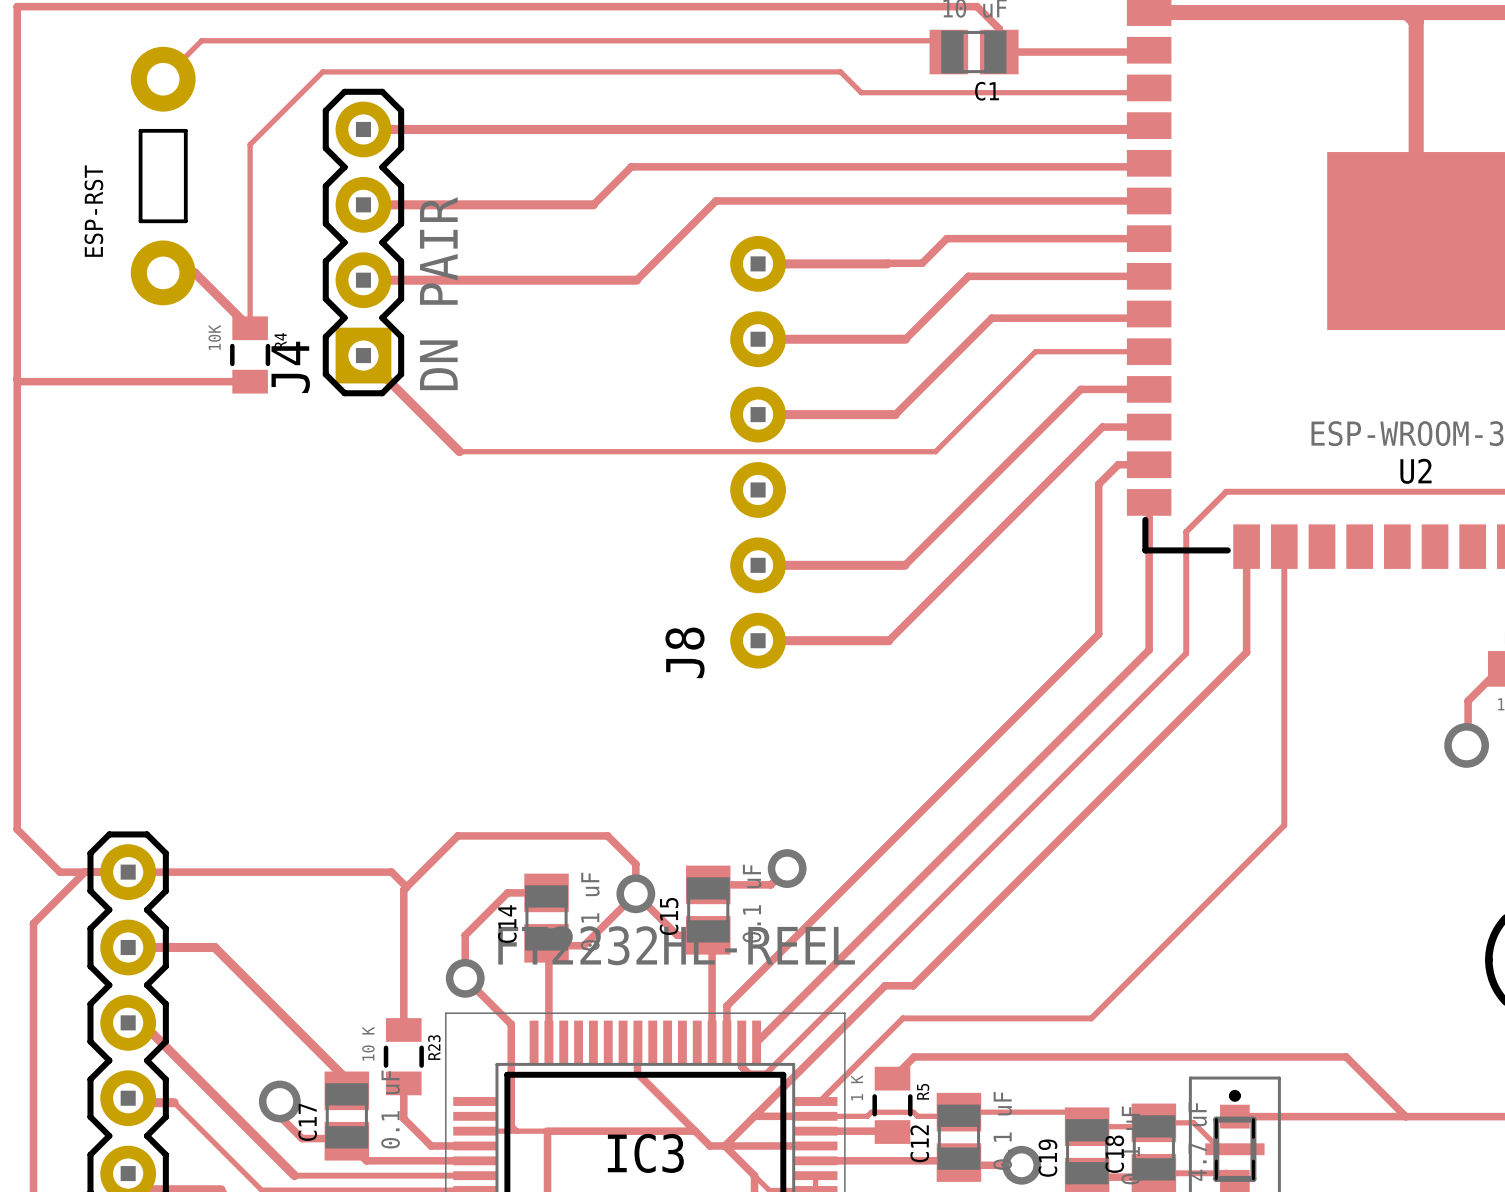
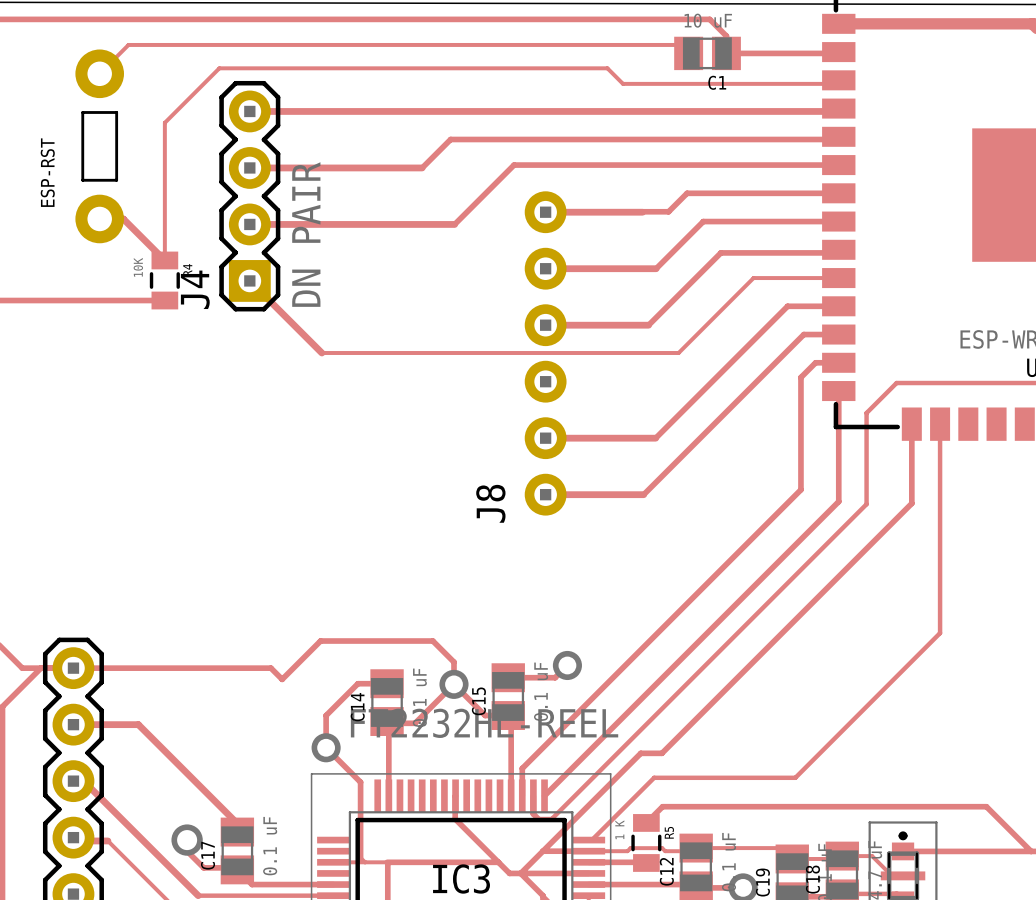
track: (406, 887) (403, 889) (403, 1029) -> none
R23: 10 K (403, 1056) -> none
track: (403, 1083) (403, 1118) (431, 1145) (475, 1145) -> none

